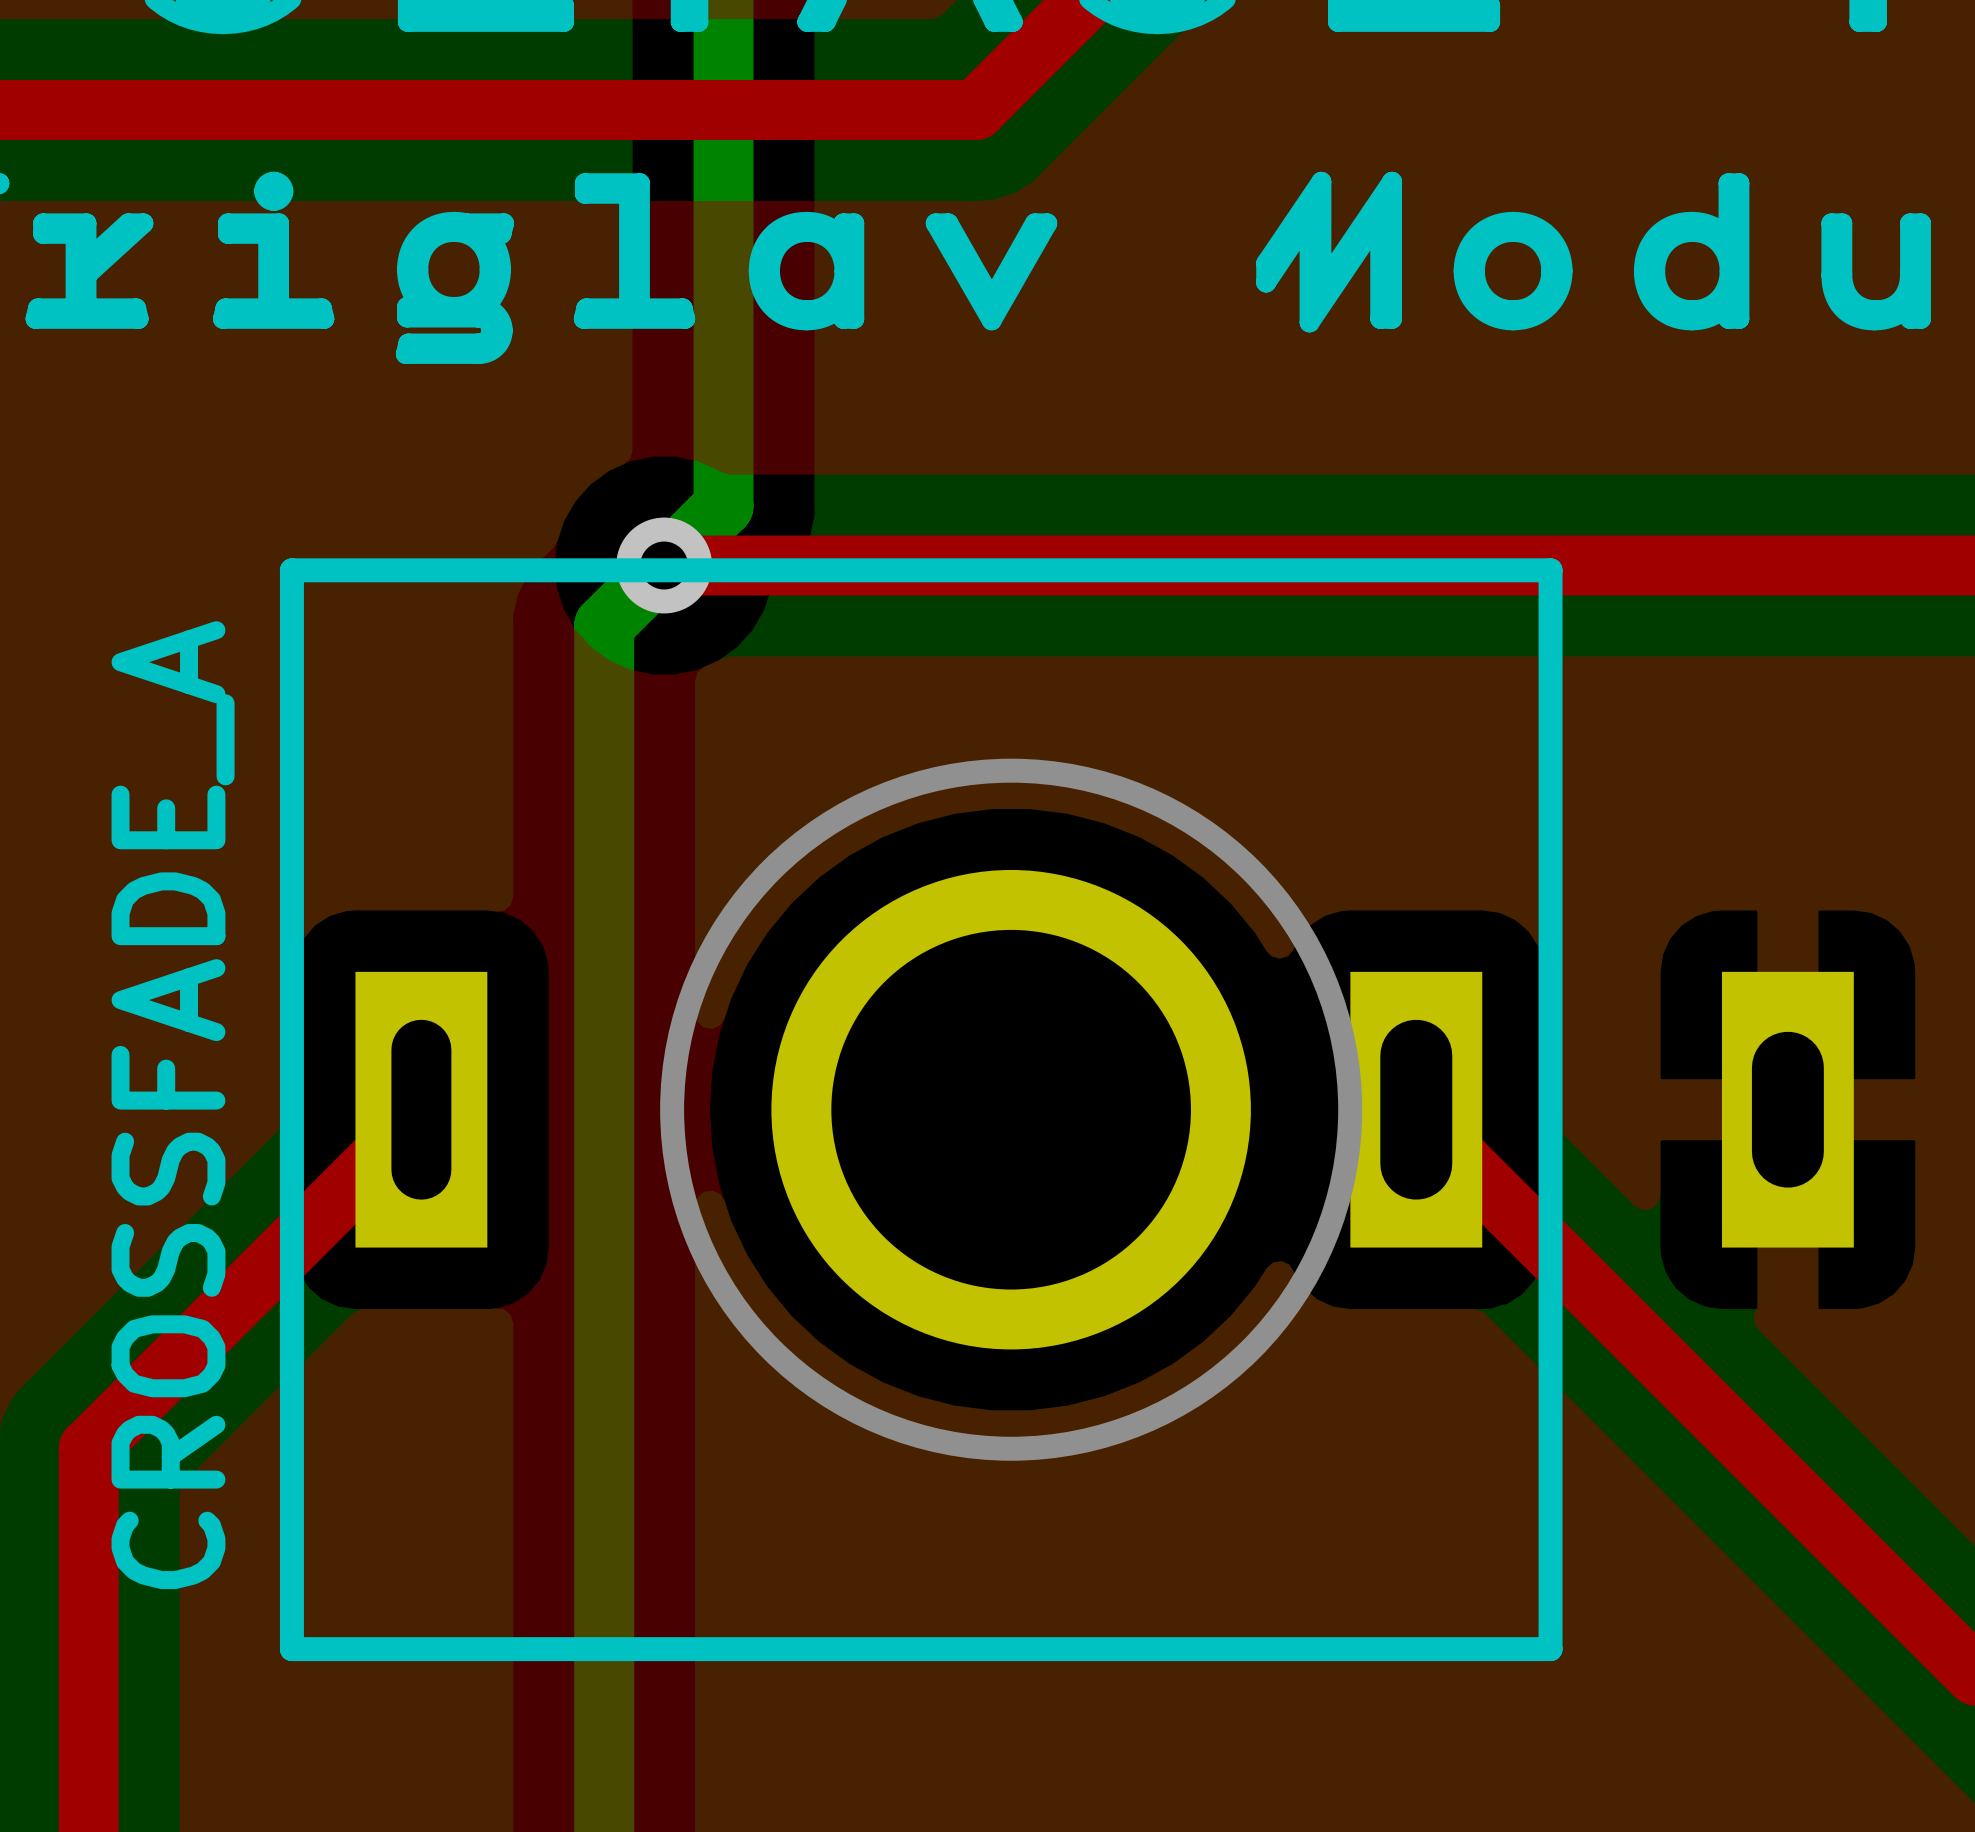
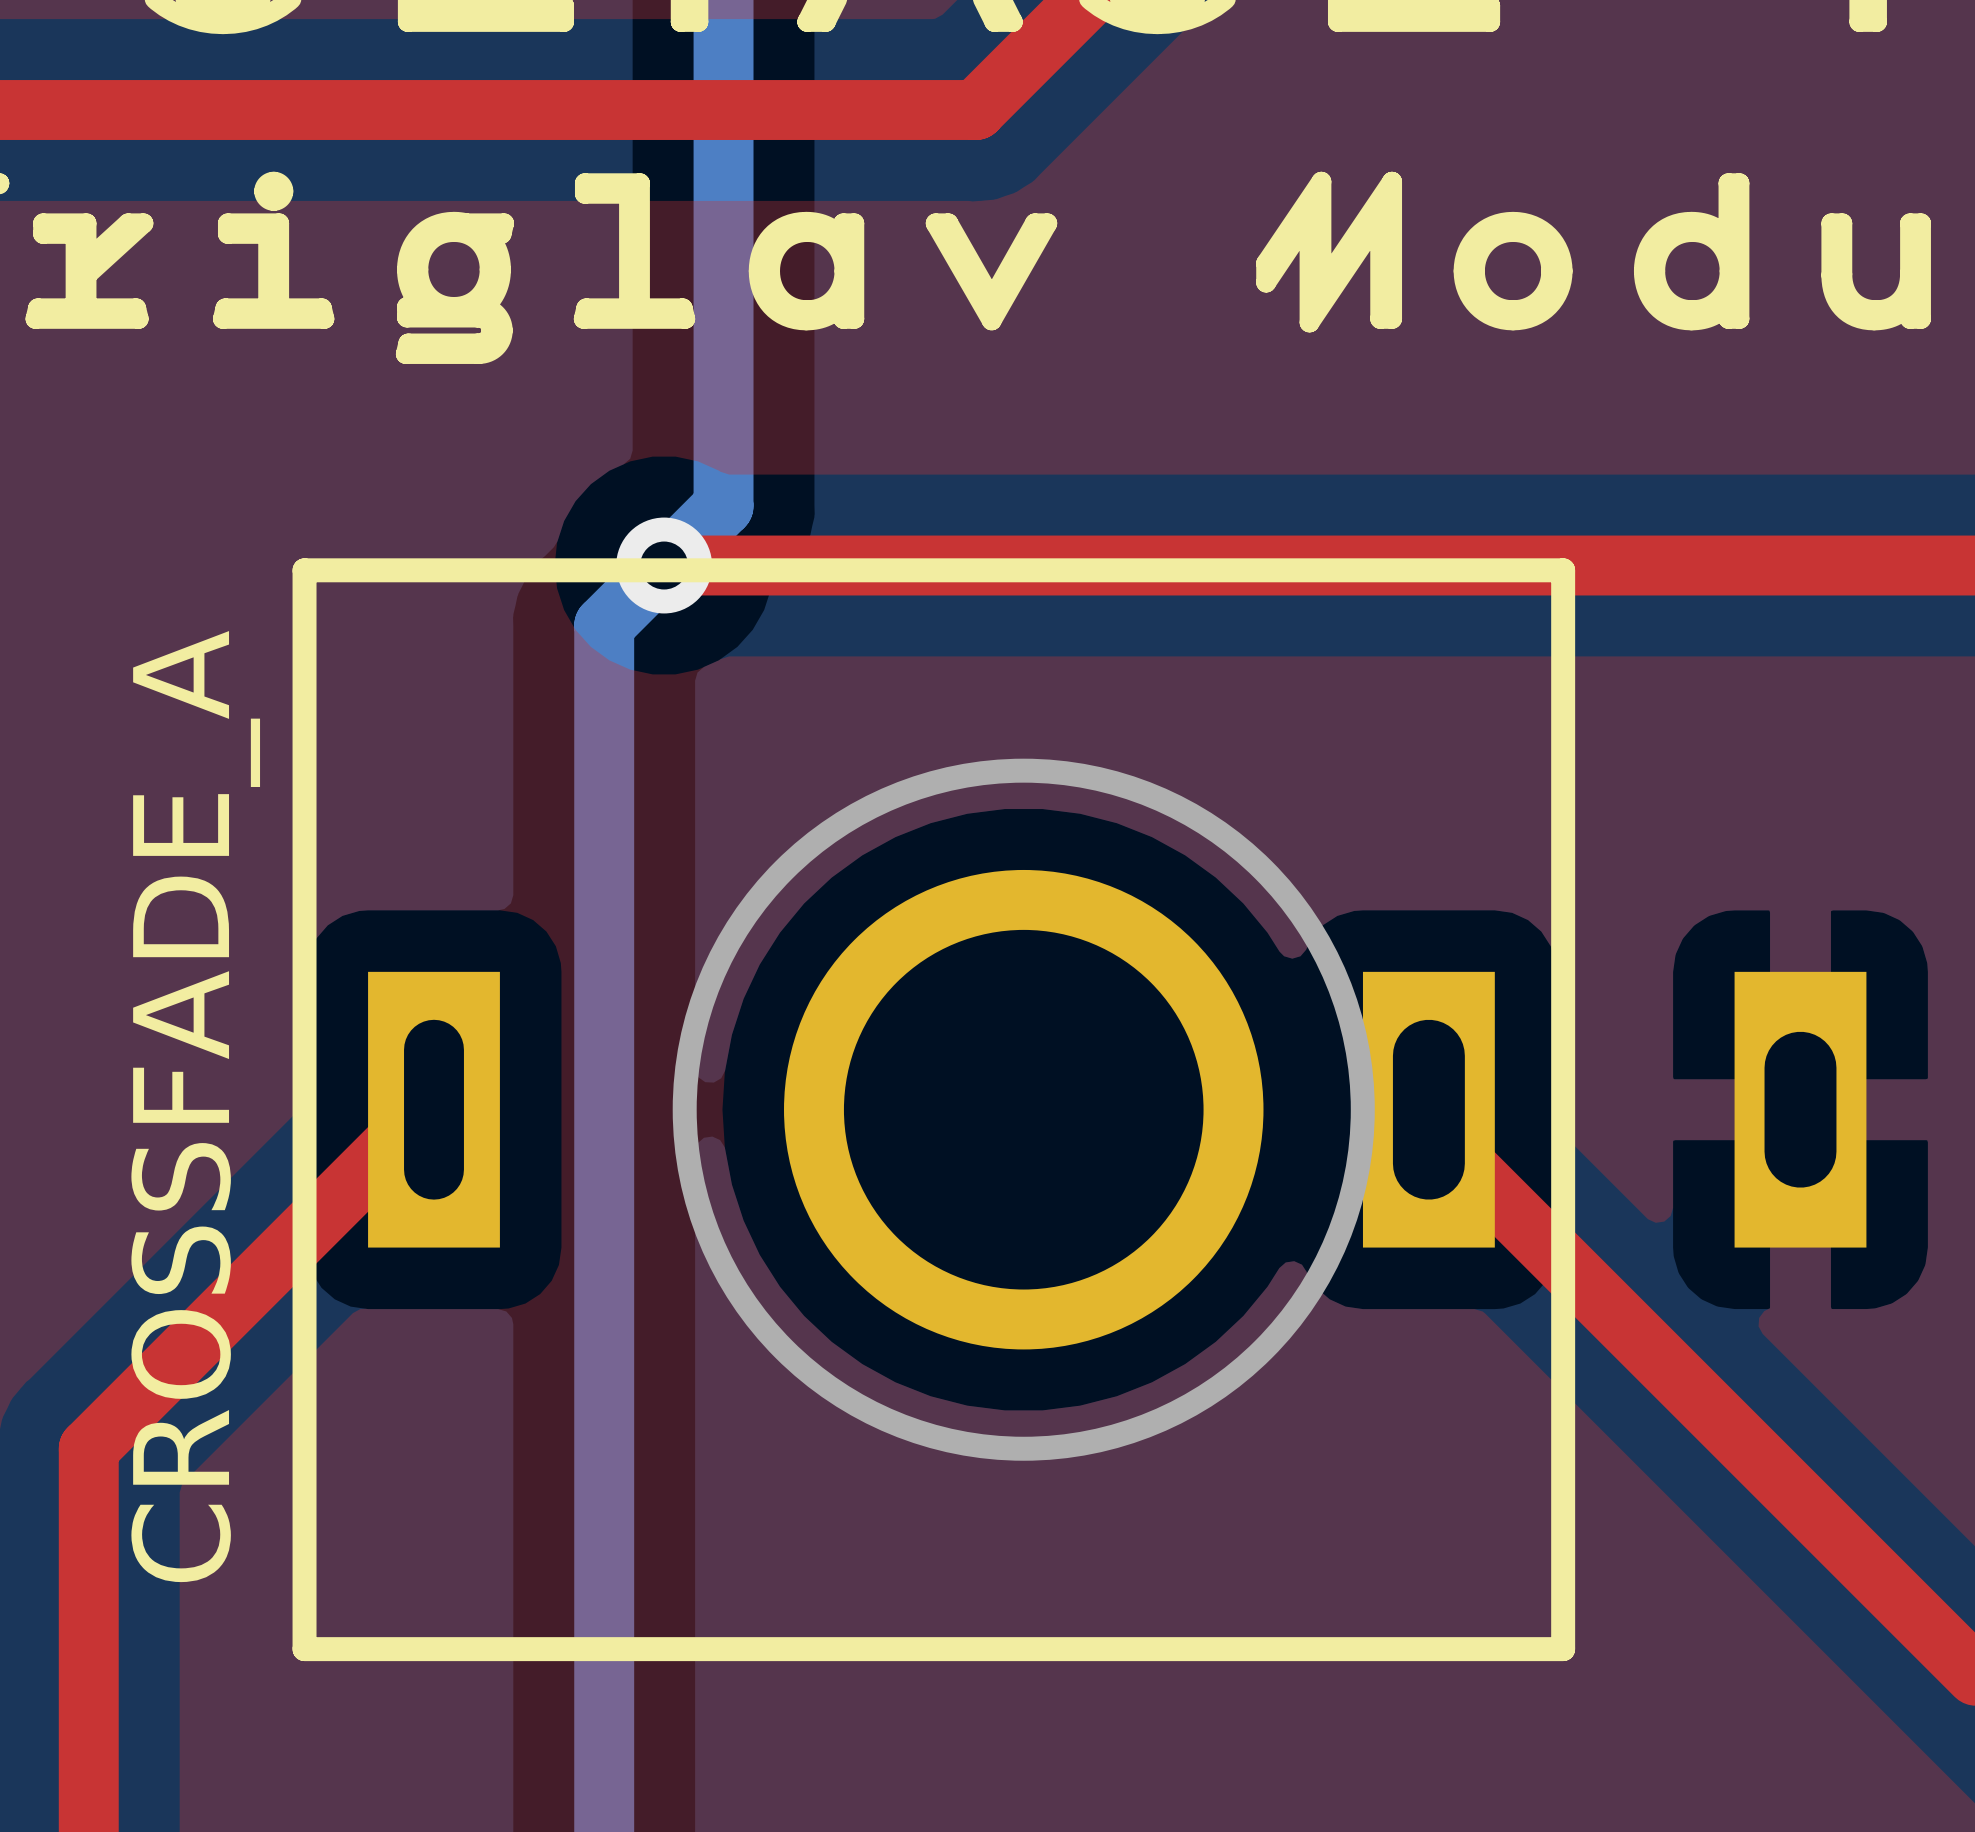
part position: (1066, 1109) -> (1079, 1109)

